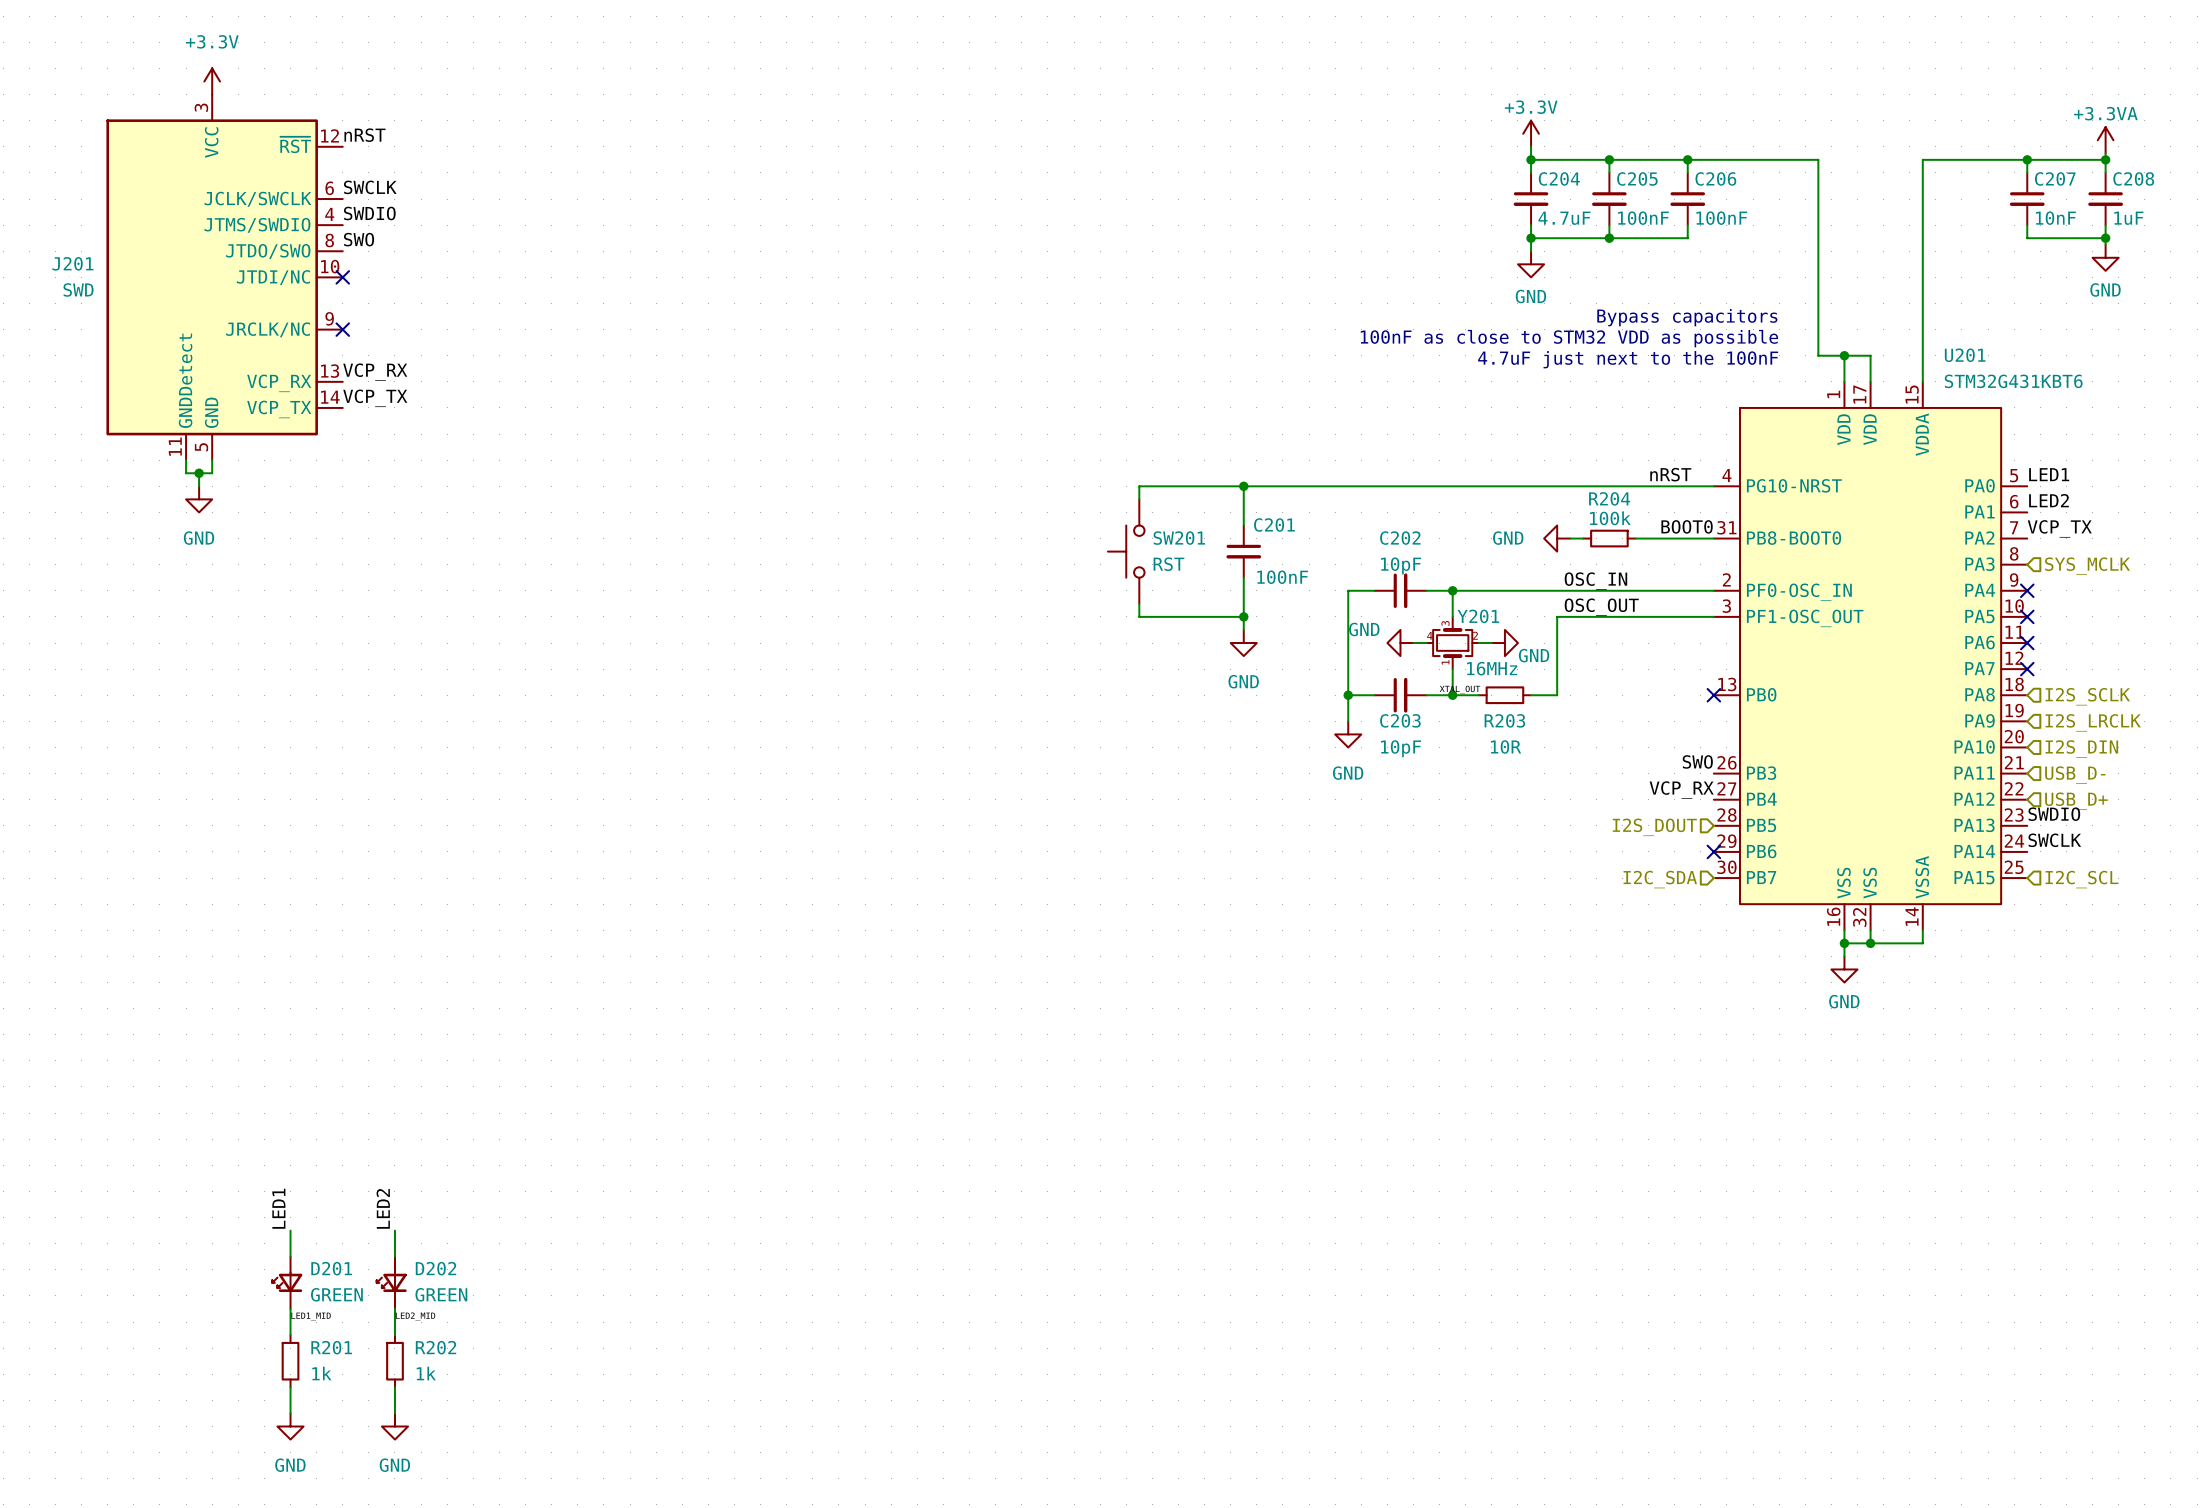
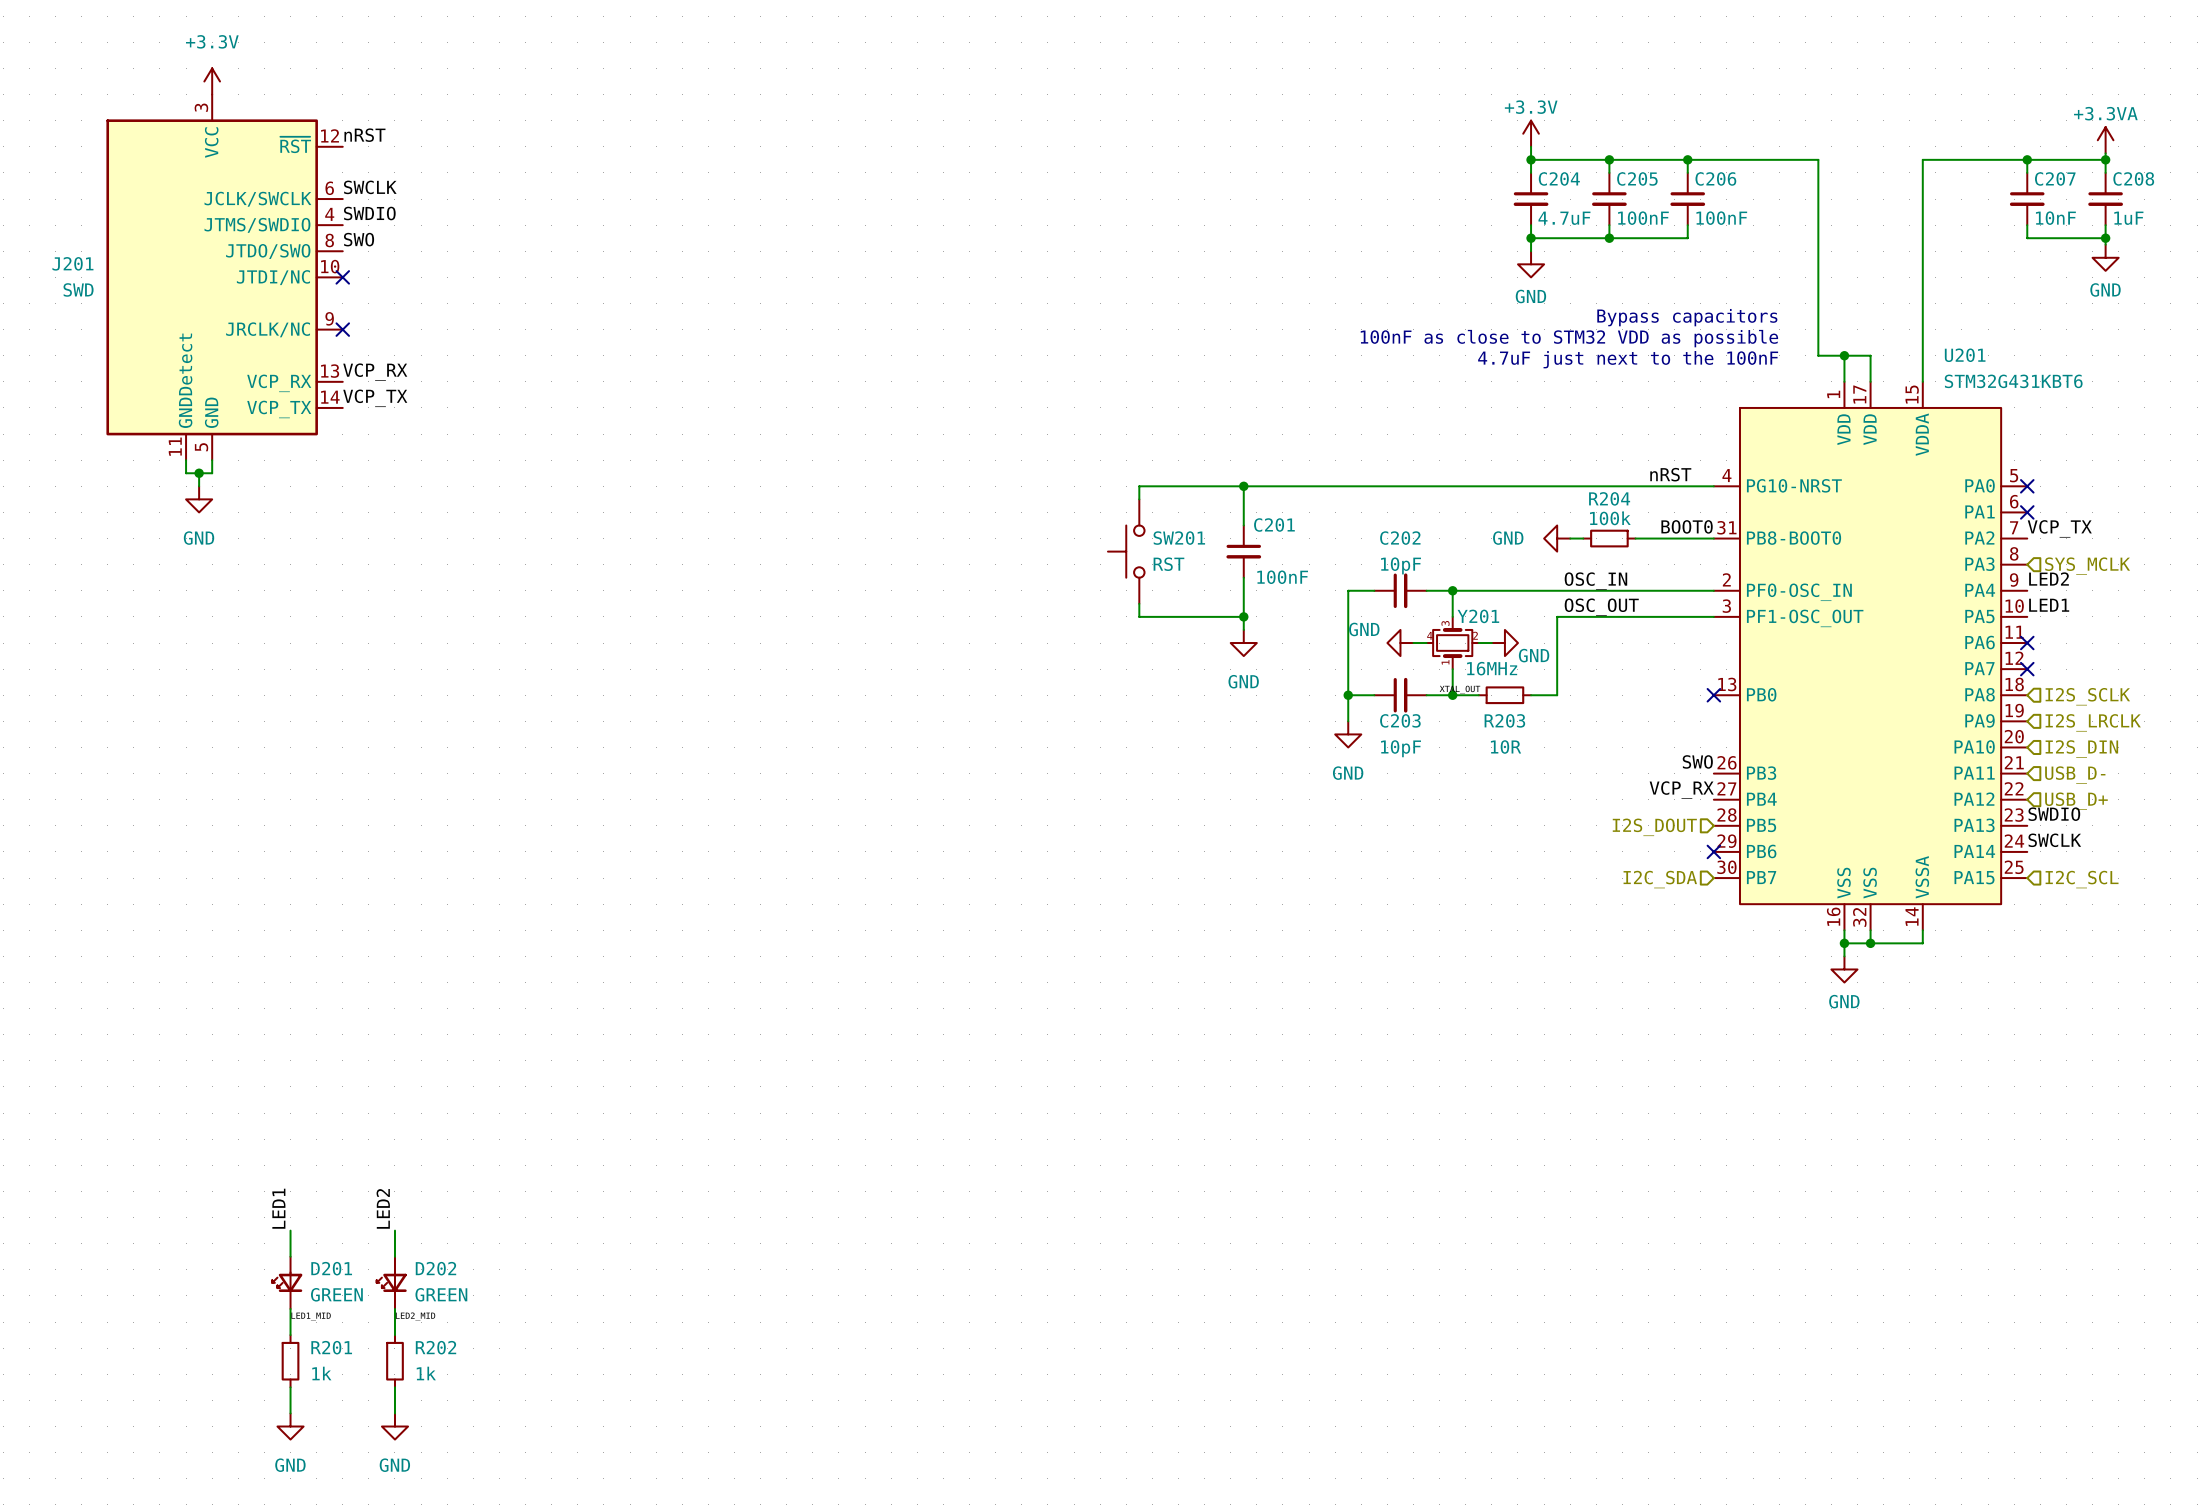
label position: LED1 (2049, 474) -> LED1 (2049, 605)
no-connect mark: none -> (2027, 486)
label position: LED2 (2049, 500) -> LED2 (2049, 579)
no-connect mark: none -> (2027, 512)
no-connect mark: (2027, 590) -> none
no-connect mark: (2027, 616) -> none

